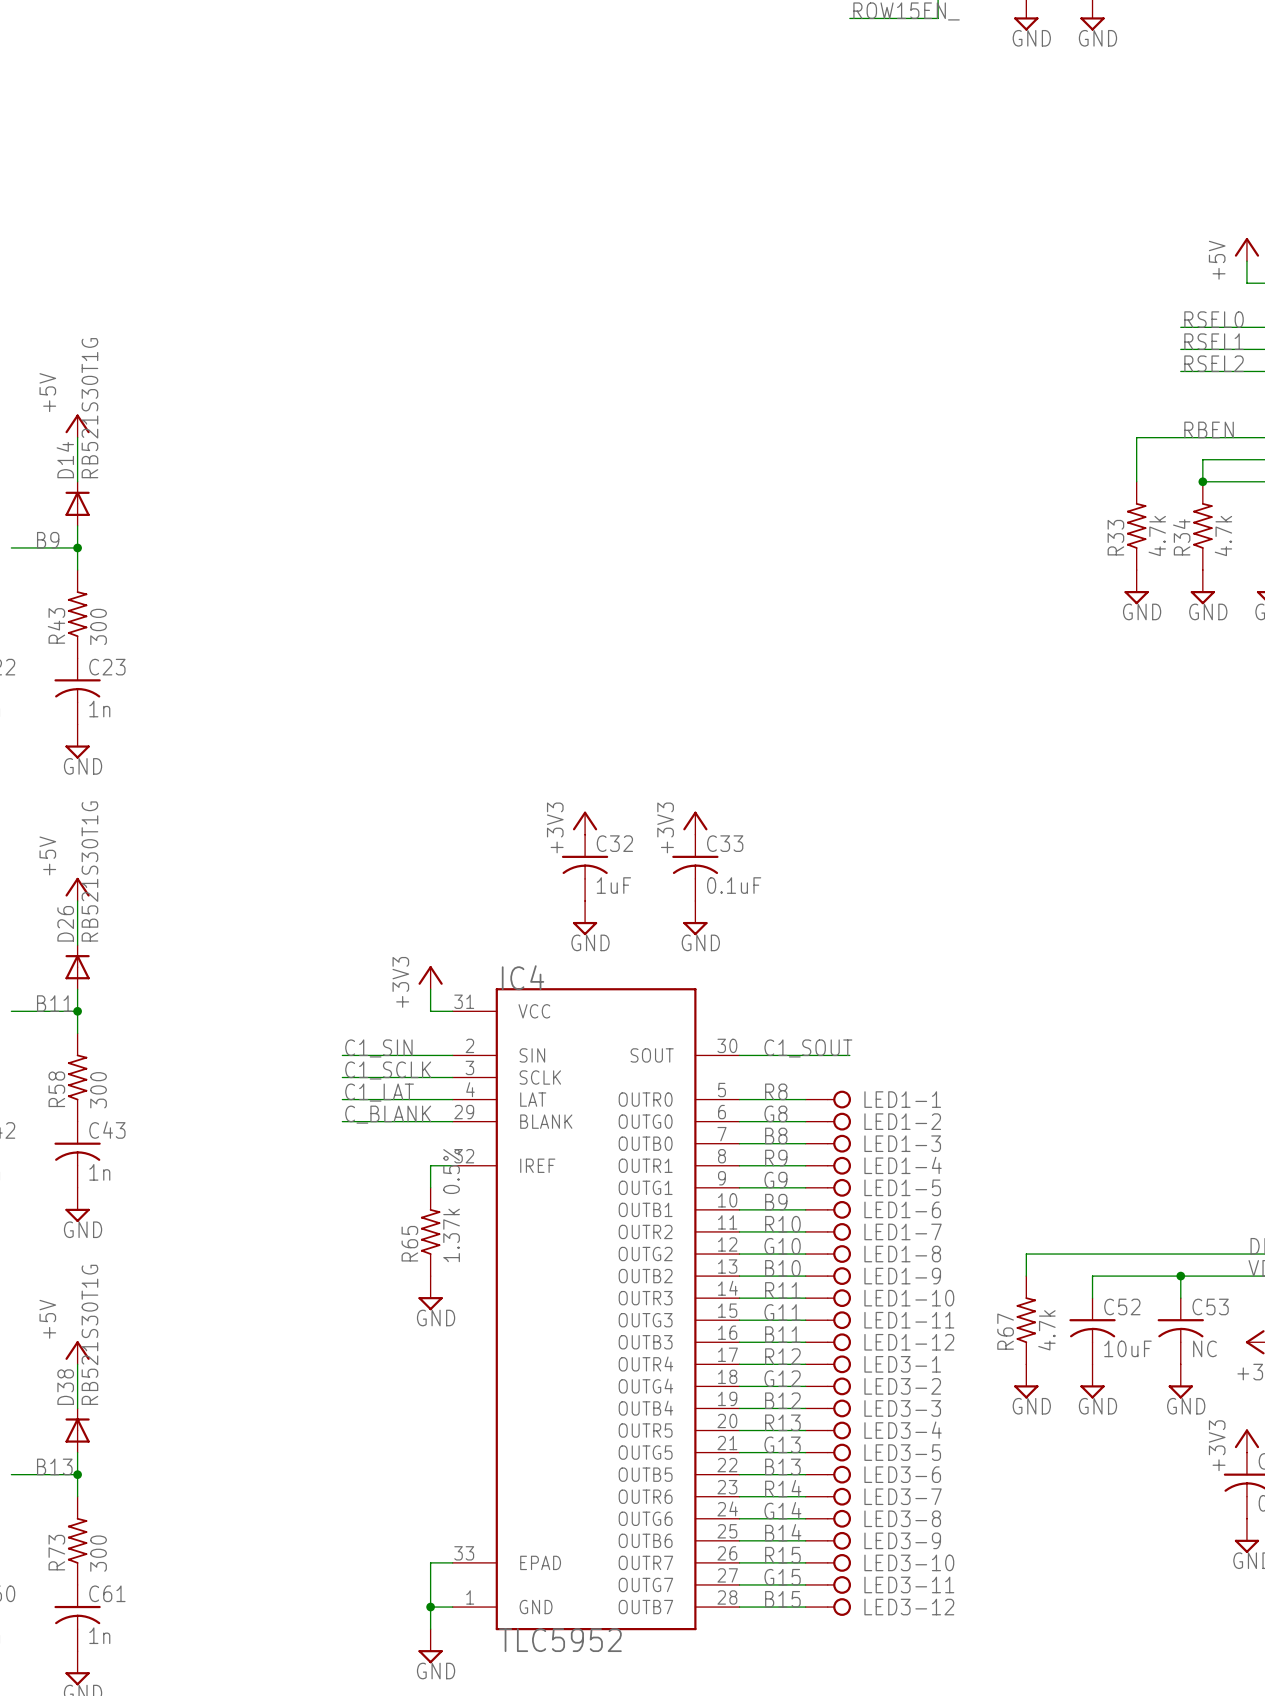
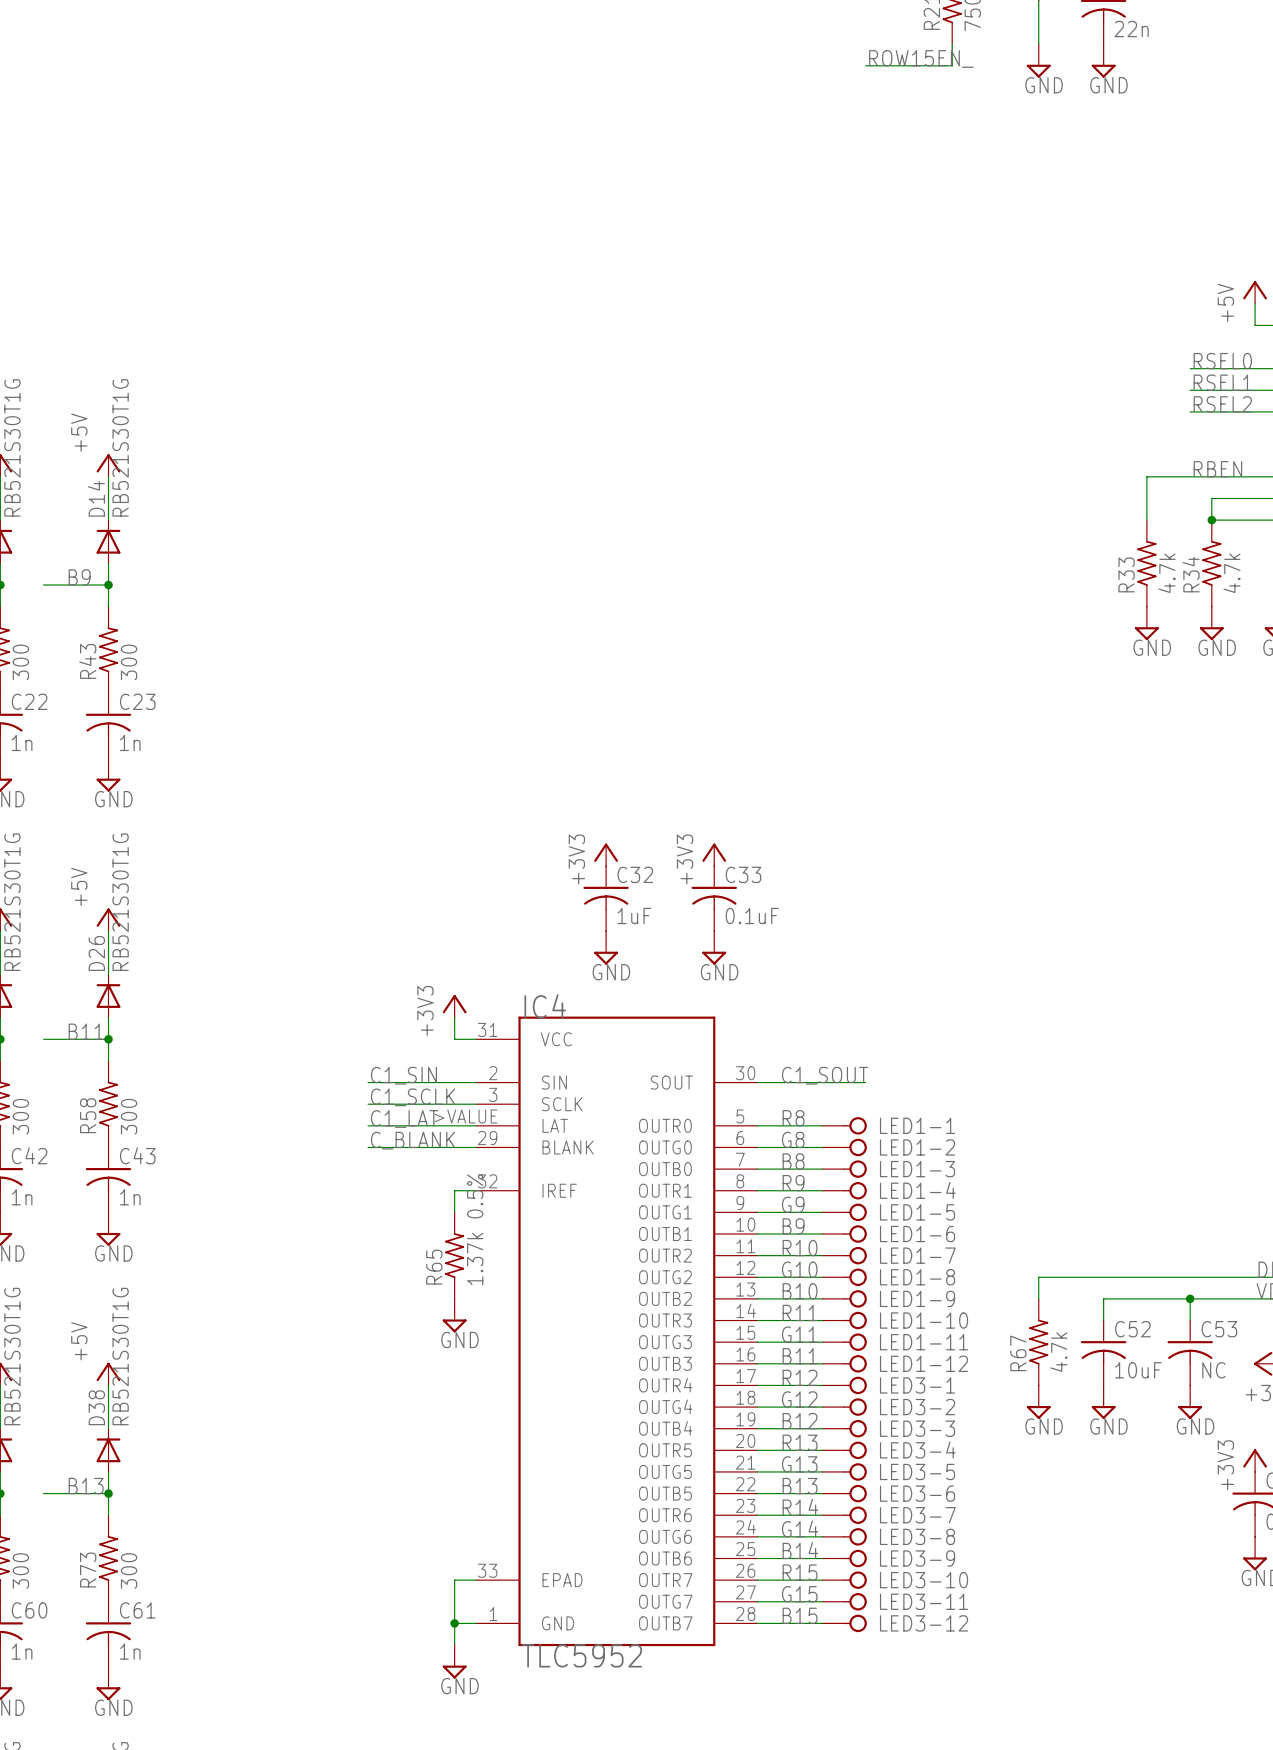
IC4 pin number: 4 (470, 1089) -> >VALUE (465, 1116)

